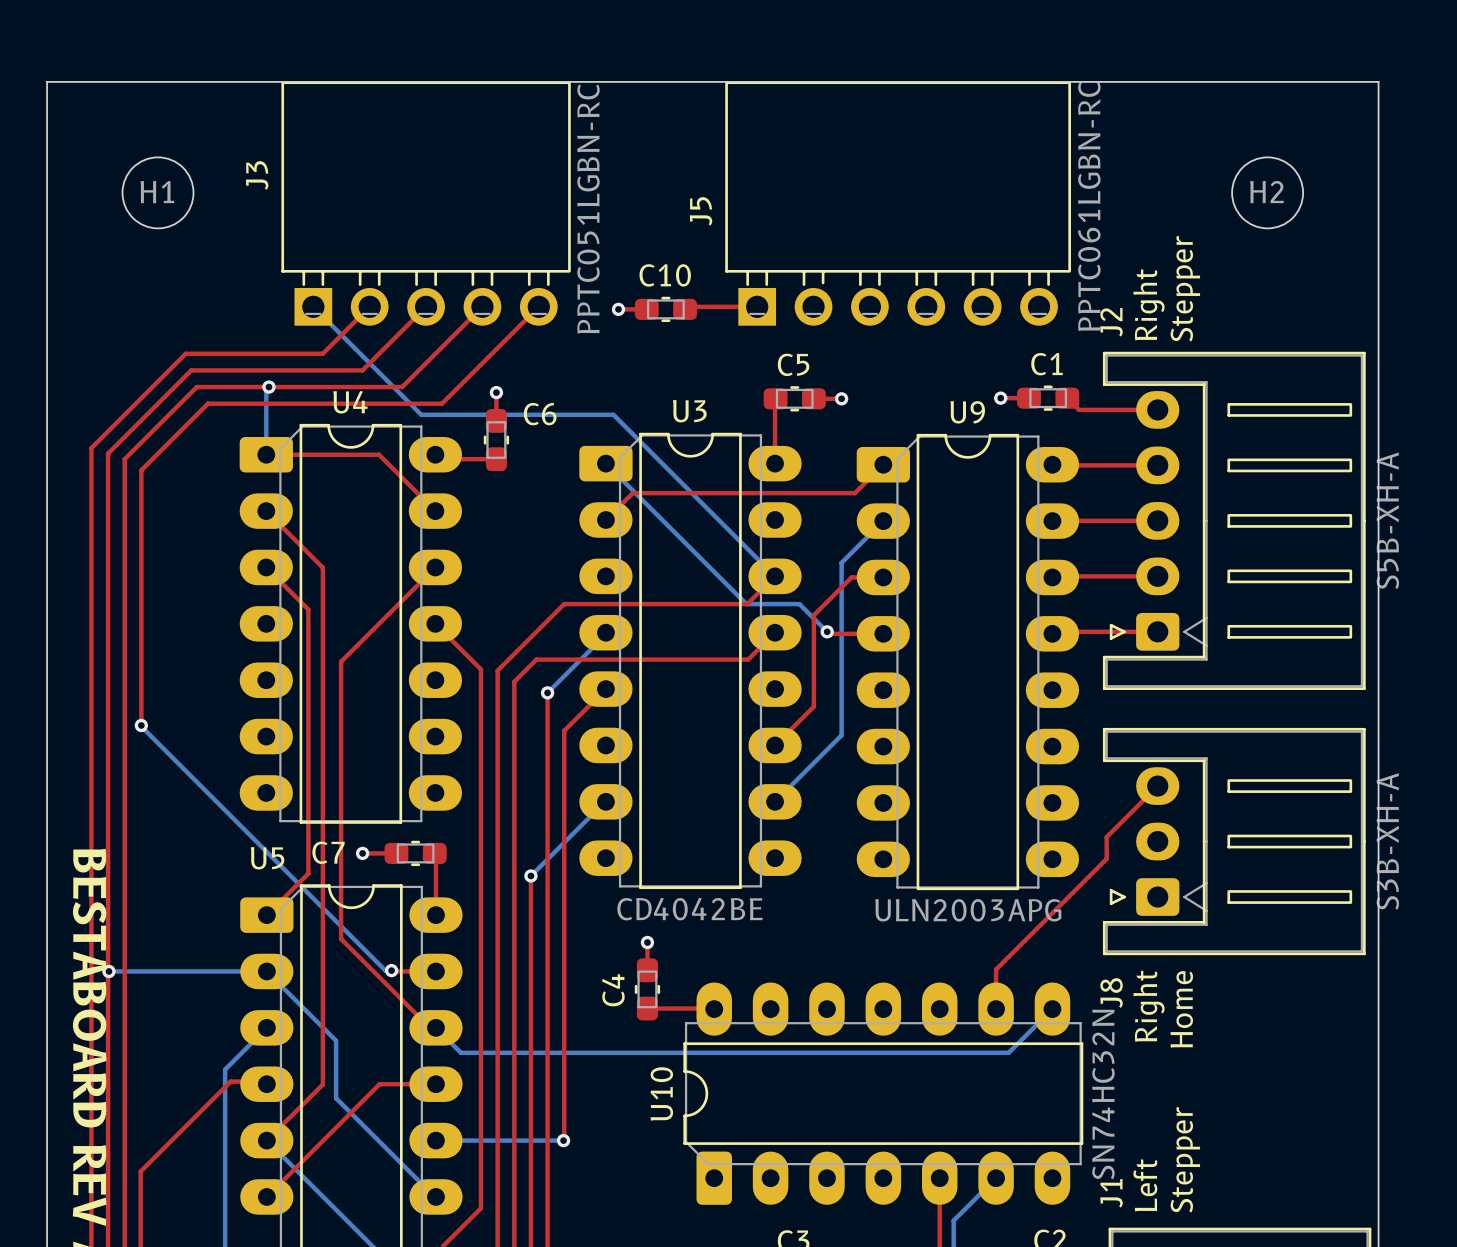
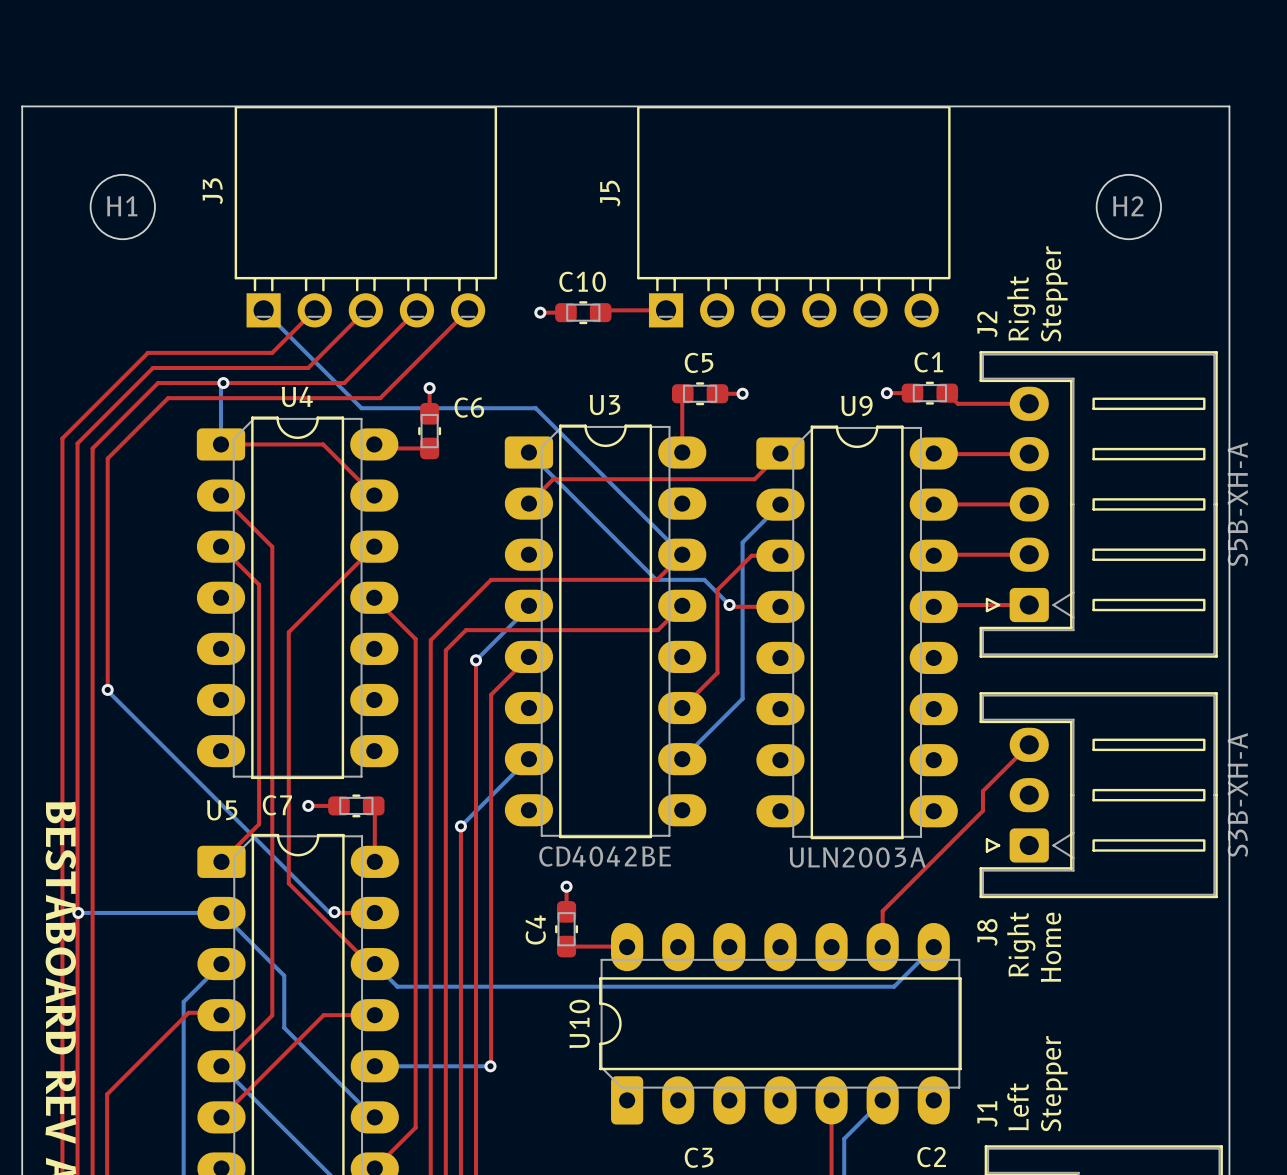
J5 value: PPTC061LGBN-RC (1089, 206) -> none
J3 value: PPTC051LGBN-RC (588, 208) -> none
J5 name position: J5 (701, 211) -> J5 (610, 193)
U9 value: ULN2003APG (968, 910) -> ULN2003A (857, 857)
U10 value: SN74HC32N (1103, 1094) -> none

